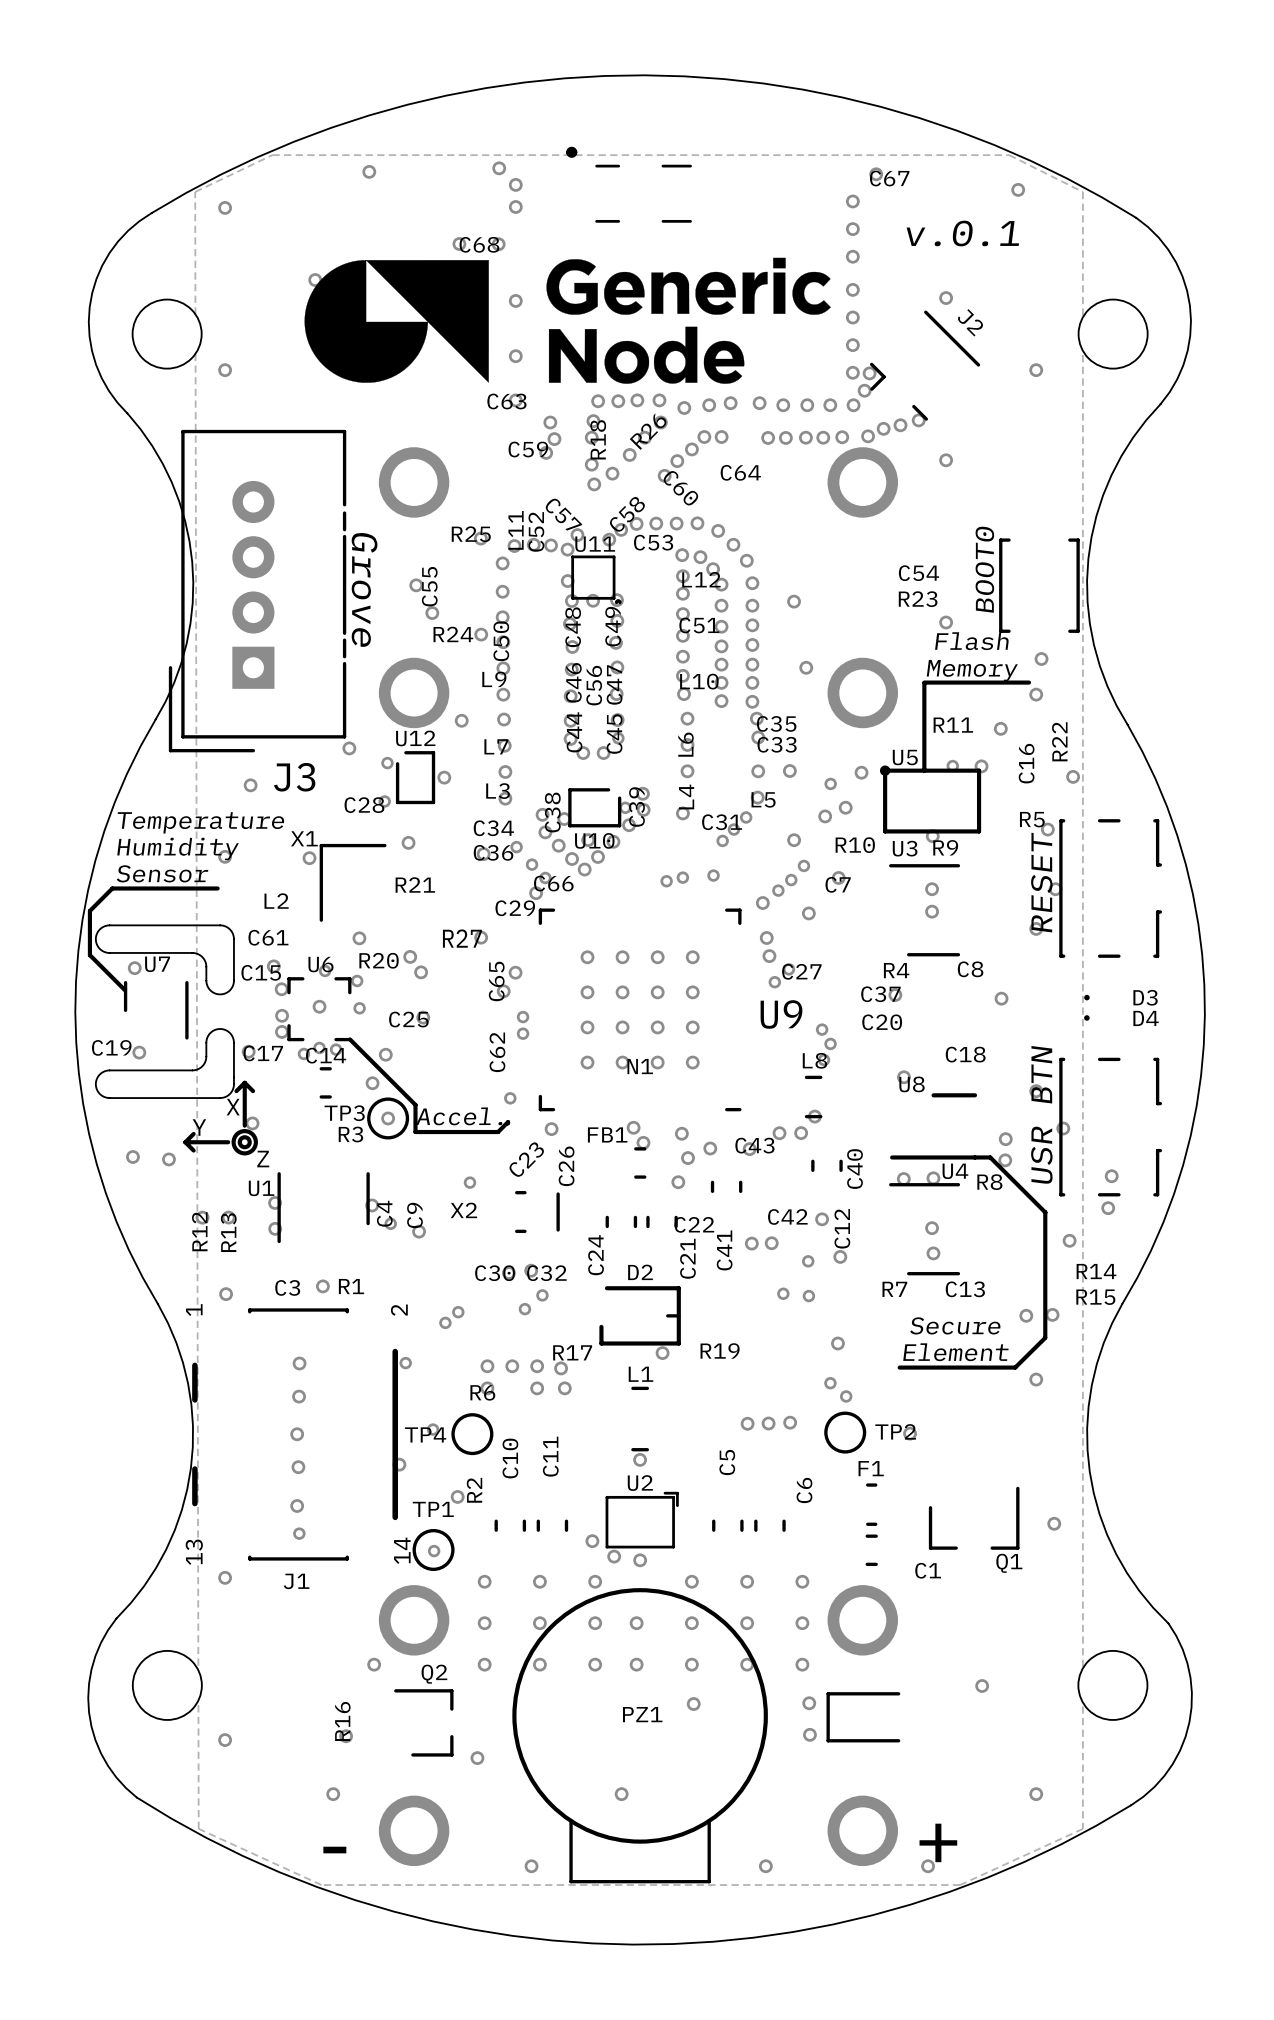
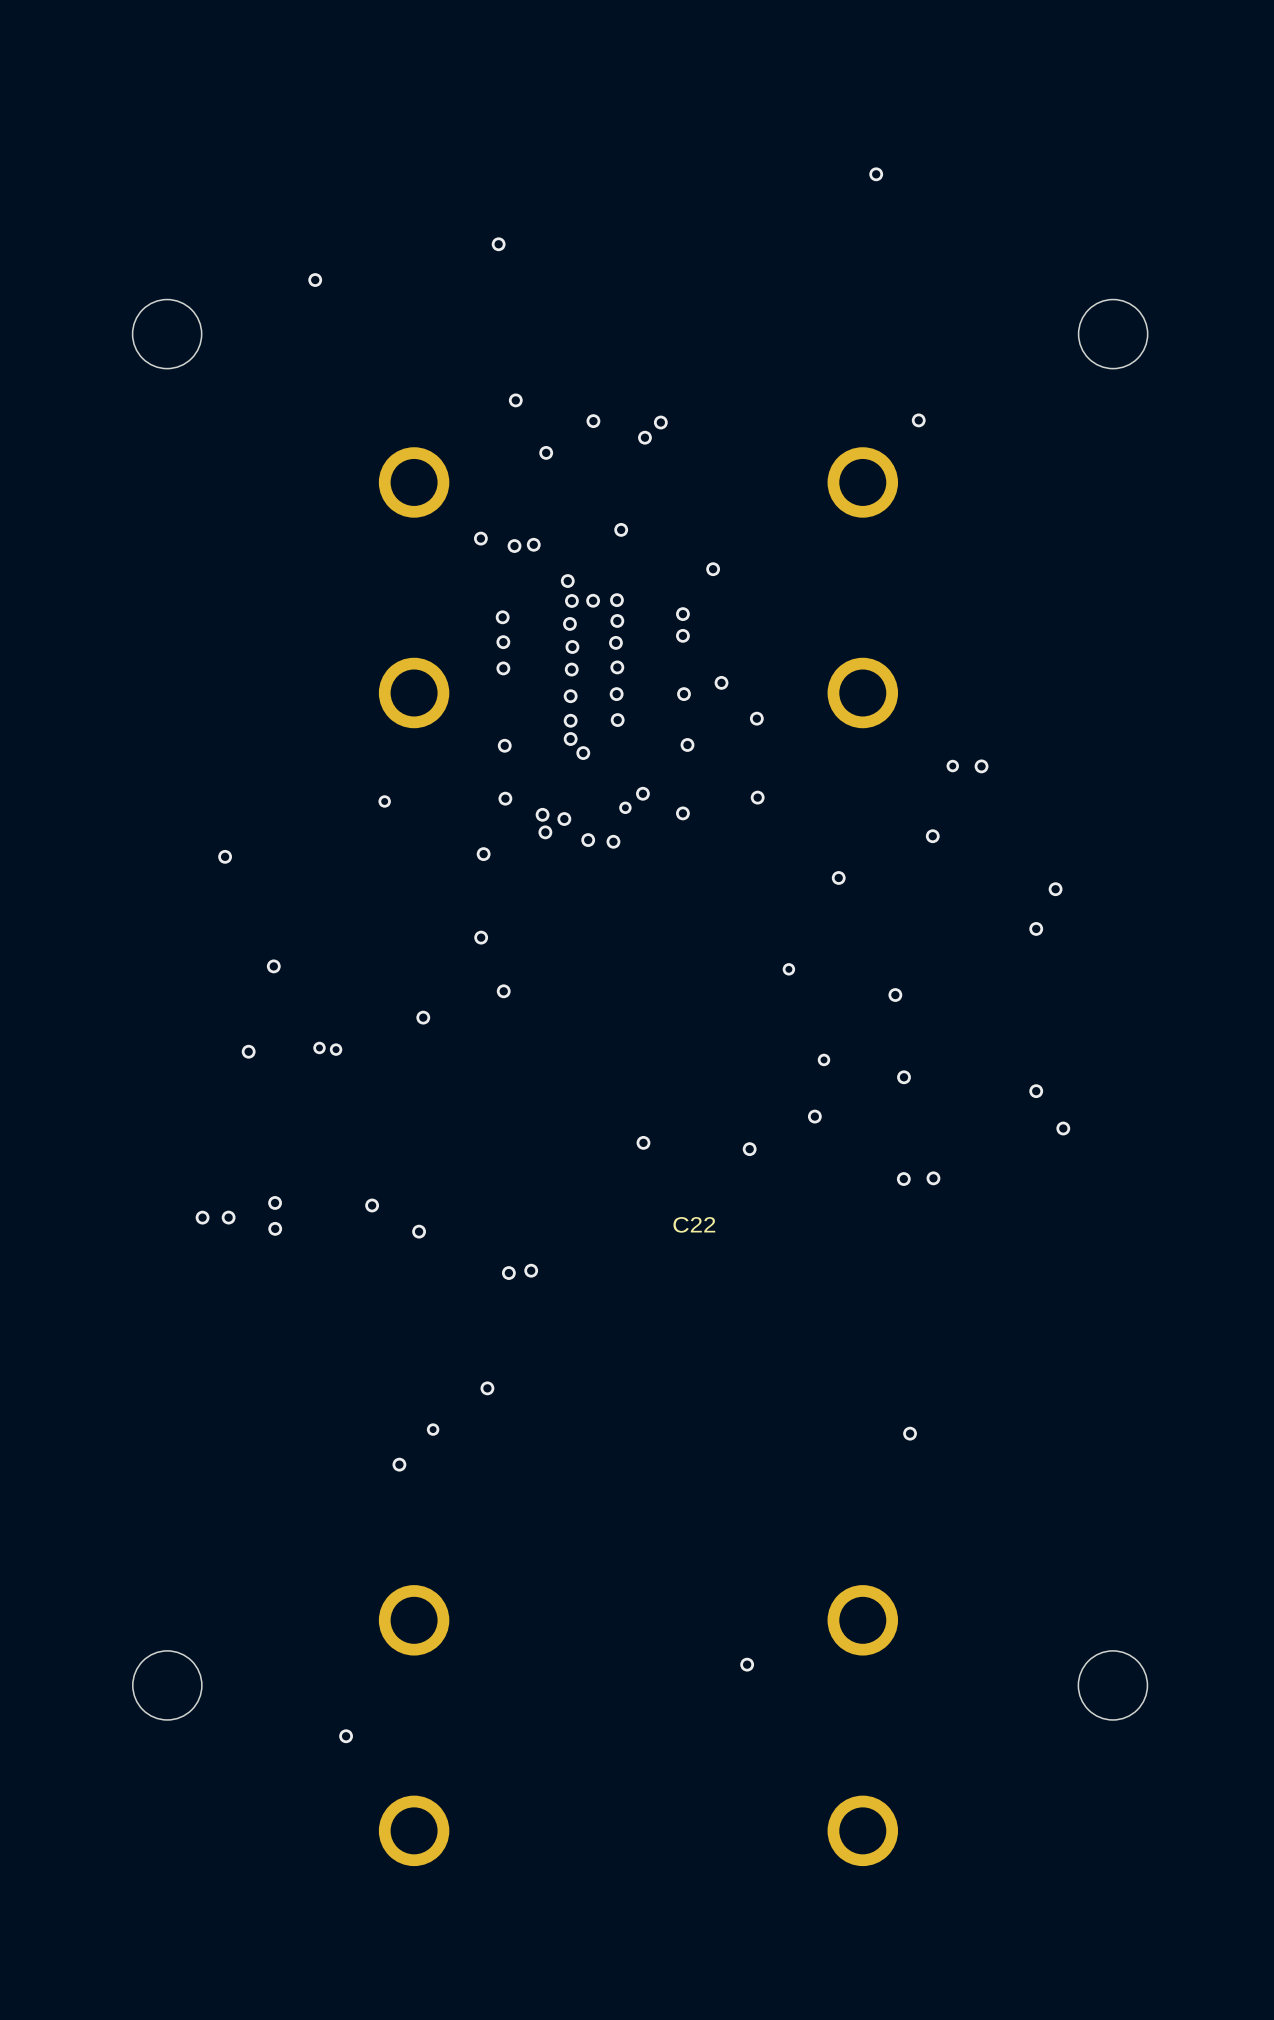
zone outline: (272, 155) (195, 191) (198, 1828) (321, 1885) (960, 1885) (1082, 1828) (1082, 191) (1009, 155) (272, 155) -> none
via: (499, 168) -> none
via: (369, 171) -> none
C67: (889, 178) -> none
via: (515, 184) -> none
part: (629, 184) -> none
via: (1018, 189) -> none
via: (852, 201) -> none
via: (225, 207) -> none
via: (515, 207) -> none
via: (852, 229) -> none
text: v.0.1 (962, 233) -> none
via: (459, 243) -> none
C68: (479, 244) -> none
via: (852, 256) -> none
drawing: [304, 257, 831, 384] -> none
via: (852, 289) -> none
via: (946, 298) -> none
via: (515, 300) -> none
via: (852, 317) -> none
via: (852, 345) -> none
via: (515, 356) -> none
J2: (925, 365) -> none
via: (225, 370) -> none
via: (1036, 370) -> none
via: (852, 372) -> none
via: (869, 373) -> none
via: (864, 390) -> none
via: (637, 400) -> none
via: (659, 400) -> none
C63: (506, 401) -> none
via: (598, 401) -> none
via: (618, 401) -> none
via: (730, 403) -> none
via: (759, 403) -> none
via: (709, 405) -> none
via: (783, 405) -> none
via: (807, 405) -> none
via: (830, 405) -> none
via: (853, 405) -> none
via: (684, 408) -> none
via: (550, 422) -> none
via: (900, 425) -> none
via: (883, 428) -> none
R26: (648, 431) -> none
via: (868, 436) -> none
via: (591, 437) -> none
via: (704, 437) -> none
via: (721, 437) -> none
via: (768, 437) -> none
via: (785, 437) -> none
via: (805, 437) -> none
via: (823, 437) -> none
via: (842, 437) -> none
via: (554, 439) -> none
R18: (598, 439) -> none
C59: (528, 449) -> none
via: (691, 449) -> none
via: (629, 454) -> none
via: (946, 460) -> none
via: (677, 461) -> none
via: (591, 464) -> none
C64: (740, 472) -> none
via: (612, 473) -> none
via: (664, 475) -> none
via: (594, 484) -> none
C60: (680, 488) -> none
C57: (563, 514) -> none
C58: (627, 514) -> none
via: (636, 523) -> none
via: (656, 523) -> none
via: (676, 523) -> none
via: (697, 523) -> none
L11: (516, 530) -> none
via: (718, 530) -> none
C52: (536, 531) -> none
R25: (471, 534) -> none
via: (577, 535) -> none
via: (609, 539) -> none
C53: (653, 542) -> none
via: (733, 544) -> none
via: (551, 545) -> none
via: (567, 549) -> none
via: (682, 555) -> none
via: (700, 557) -> none
via: (746, 560) -> none
via: (502, 563) -> none
text: BOOT0 (984, 569) -> none
C54: (918, 573) -> none
via: (682, 576) -> none
U11: (596, 579) -> none
L12: (701, 579) -> none
via: (752, 583) -> none
via: (721, 584) -> none
via: (416, 585) -> none
part: (1039, 585) -> none
C55: (429, 586) -> none
text: Grove (364, 589) -> none
J3: (257, 591) -> none
via: (502, 591) -> none
via: (682, 593) -> none
R23: (918, 599) -> none
via: (794, 601) -> none
via: (721, 605) -> none
via: (752, 605) -> none
via: (432, 613) -> none
via: (946, 622) -> none
C51: (699, 625) -> none
via: (752, 625) -> none
C49: (613, 626) -> none
via: (721, 626) -> none
C48: (573, 627) -> none
R24: (453, 634) -> none
via: (481, 634) -> none
C50: (501, 641) -> none
text: Flash (971, 641) -> none
via: (752, 644) -> none
via: (721, 646) -> none
via: (682, 656) -> none
via: (1041, 659) -> none
via: (721, 664) -> none
via: (752, 664) -> none
via: (806, 667) -> none
text: Memory (972, 670) -> none
via: (682, 675) -> none
L9: (494, 679) -> none
L10: (699, 681) -> none
C46: (573, 682) -> none
via: (752, 682) -> none
line: (924, 682) (1028, 682) -> none
line: (924, 682) (924, 770) -> none
C47: (614, 684) -> none
C56: (594, 685) -> none
via: (503, 694) -> none
via: (1036, 694) -> none
via: (721, 701) -> none
via: (752, 701) -> none
via: (687, 718) -> none
via: (504, 719) -> none
via: (461, 720) -> none
C35: (776, 723) -> none
R11: (953, 725) -> none
via: (1000, 728) -> none
C44: (574, 732) -> none
C45: (614, 734) -> none
via: (758, 737) -> none
via: (618, 738) -> none
R22: (1059, 741) -> none
L6: (686, 744) -> none
C33: (777, 744) -> none
L7: (496, 746) -> none
via: (349, 748) -> none
via: (603, 753) -> none
via: (387, 763) -> none
C16: (1026, 763) -> none
via: (687, 771) -> none
via: (758, 771) -> none
via: (789, 771) -> none
via: (505, 772) -> none
via: (861, 772) -> none
via: (1073, 776) -> none
U12: (415, 777) -> none
via: (444, 777) -> none
via: (830, 783) -> none
via: (250, 785) -> none
L3: (498, 791) -> none
L4: (686, 796) -> none
L5: (763, 799) -> none
U5: (930, 799) -> none
C28: (364, 805) -> none
U10: (594, 807) -> none
C39: (637, 807) -> none
via: (845, 807) -> none
via: (643, 809) -> none
C38: (552, 812) -> none
via: (825, 816) -> none
via: (746, 817) -> none
R5: (1032, 819) -> none
text: Temperature (200, 822) -> none
C31: (722, 822) -> none
via: (629, 825) -> none
C34: (493, 828) -> none
via: (733, 829) -> none
via: (1047, 829) -> none
via: (722, 840) -> none
via: (794, 840) -> none
via: (408, 842) -> none
via: (558, 845) -> none
R10: (855, 845) -> none
via: (516, 847) -> none
R9: (945, 847) -> none
text: Humidity (178, 848) -> none
C36: (493, 852) -> none
via: (597, 856) -> none
via: (309, 858) -> none
via: (572, 859) -> none
via: (532, 864) -> none
via: (803, 865) -> none
via: (584, 869) -> none
text: Sensor (162, 873) -> none
via: (713, 875) -> none
via: (545, 877) -> none
via: (682, 877) -> none
via: (791, 880) -> none
via: (666, 881) -> none
X1: (353, 882) -> none
text: RESET (1041, 882) -> none
C66: (553, 883) -> none
R21: (415, 884) -> none
C7: (838, 884) -> none
line: (217, 888) (112, 888) (89, 910) (89, 955) (125, 990) -> none
part: (1110, 888) -> none
via: (932, 889) -> none
via: (778, 890) -> none
via: (536, 893) -> none
L2: (276, 901) -> none
via: (762, 903) -> none
C29: (515, 908) -> none
U3: (924, 910) -> none
via: (932, 911) -> none
via: (808, 913) -> none
board edge: (109, 925) (220, 925) (227, 927) (233, 937) (233, 980) (232, 987) (221, 994) (210, 990) (206, 982) (205, 961) (196, 953) (109, 952) (102, 951) (96, 944) (96, 935) (101, 928) (109, 925) -> none
C61: (268, 937) -> none
via: (766, 937) -> none
via: (359, 938) -> none
R27: (462, 938) -> none
via: (410, 956) -> none
via: (769, 956) -> none
via: (587, 957) -> none
via: (622, 957) -> none
via: (657, 957) -> none
via: (692, 957) -> none
R20: (379, 960) -> none
via: (134, 968) -> none
C8: (970, 969) -> none
via: (325, 970) -> none
R4: (896, 970) -> none
C27: (801, 971) -> none
C15: (261, 972) -> none
via: (421, 972) -> none
via: (515, 972) -> none
via: (357, 980) -> none
C65: (496, 981) -> none
via: (774, 982) -> none
via: (281, 989) -> none
via: (587, 992) -> none
via: (622, 992) -> none
via: (657, 992) -> none
via: (692, 992) -> none
C37: (880, 994) -> none
D3: (1086, 997) -> none
via: (1001, 998) -> none
via: (319, 1006) -> none
via: (359, 1008) -> none
U6: (319, 1009) -> none
U9: (640, 1009) -> none
U7: (156, 1010) -> none
via: (282, 1015) -> none
via: (523, 1017) -> none
D4: (1086, 1017) -> none
C25: (408, 1019) -> none
C20: (882, 1022) -> none
via: (587, 1027) -> none
via: (622, 1027) -> none
via: (657, 1027) -> none
via: (692, 1027) -> none
via: (822, 1029) -> none
via: (281, 1031) -> none
via: (523, 1033) -> none
line: (350, 1039) (415, 1104) (415, 1132) (498, 1132) (508, 1123) -> none
board edge: (206, 1042) (205, 1060) (197, 1069) (106, 1070) (97, 1077) (96, 1089) (101, 1095) (109, 1098) (225, 1096) (231, 1092) (233, 1086) (232, 1037) (227, 1030) (218, 1029) (209, 1034) (206, 1042) -> none
via: (830, 1043) -> none
C19: (111, 1047) -> none
via: (139, 1052) -> none
C62: (497, 1052) -> none
C17: (263, 1053) -> none
via: (303, 1053) -> none
via: (385, 1054) -> none
C18: (965, 1054) -> none
via: (587, 1062) -> none
via: (622, 1062) -> none
via: (657, 1062) -> none
via: (692, 1062) -> none
N1: (640, 1066) -> none
line: (244, 1082) (236, 1091) -> none
line: (244, 1082) (253, 1091) -> none
line: (244, 1082) (244, 1125) -> none
C14: (325, 1082) -> none
via: (372, 1083) -> none
L8: (813, 1097) -> none
via: (510, 1098) -> none
text: X (233, 1107) -> none
text: USR BTN (1041, 1114) -> none
text: Accel. (459, 1116) -> none
TP3: (388, 1118) -> none
via: (388, 1118) -> none
via: (252, 1123) -> none
U8: (933, 1126) -> none
text: Y (199, 1127) -> none
via: (633, 1127) -> none
part: (1110, 1127) -> none
drawing: [231, 1129, 258, 1156] -> none
via: (551, 1129) -> none
line: (193, 1133) (185, 1142) -> none
via: (681, 1133) -> none
via: (779, 1133) -> none
via: (801, 1133) -> none
R3: (350, 1134) -> none
via: (1005, 1139) -> none
line: (185, 1142) (193, 1150) -> none
line: (185, 1142) (228, 1142) -> none
C43: (754, 1145) -> none
via: (710, 1148) -> none
via: (132, 1156) -> none
line: (975, 1157) (990, 1157) (1045, 1212) -> none
via: (688, 1158) -> none
via: (168, 1159) -> none
text: Z (263, 1159) -> none
C23: (526, 1159) -> none
via: (1005, 1160) -> none
FB1: (640, 1162) -> none
C40: (826, 1165) -> none
C26: (566, 1166) -> none
via: (1111, 1176) -> none
via: (469, 1182) -> none
via: (678, 1182) -> none
R8: (989, 1182) -> none
C41: (726, 1186) -> none
U1: (323, 1207) -> none
via: (1108, 1208) -> none
X2: (537, 1212) -> none
line: (1045, 1212) (1045, 1337) -> none
C4: (384, 1213) -> none
C9: (414, 1215) -> none
C42: (787, 1216) -> none
via: (822, 1219) -> none
C24: (621, 1221) -> none
C21: (662, 1221) -> none
via: (390, 1223) -> none
C12: (842, 1228) -> none
via: (932, 1228) -> none
U4: (924, 1229) -> none
R12: (199, 1231) -> none
R13: (228, 1232) -> none
via: (1069, 1240) -> none
via: (751, 1243) -> none
via: (771, 1243) -> none
via: (933, 1253) -> none
via: (840, 1256) -> none
via: (808, 1261) -> none
R14: (1096, 1271) -> none
C30: (495, 1273) -> none
C32: (546, 1273) -> none
via: (322, 1286) -> none
R1: (351, 1286) -> none
C3: (287, 1287) -> none
R7: (894, 1289) -> none
C13: (965, 1289) -> none
via: (783, 1293) -> none
via: (226, 1294) -> none
via: (542, 1295) -> none
via: (808, 1296) -> none
R15: (1095, 1297) -> none
via: (524, 1309) -> none
via: (458, 1312) -> none
via: (1052, 1314) -> none
D2: (640, 1315) -> none
via: (1026, 1315) -> none
via: (445, 1322) -> none
text: Secure (955, 1325) -> none
line: (1045, 1337) (1015, 1367) -> none
via: (837, 1343) -> none
R19: (720, 1350) -> none
R17: (572, 1352) -> none
text: Element (955, 1352) -> none
via: (662, 1353) -> none
via: (299, 1363) -> none
via: (405, 1363) -> none
via: (487, 1366) -> none
via: (512, 1366) -> none
via: (537, 1366) -> none
line: (899, 1367) (1015, 1367) -> none
via: (561, 1368) -> none
via: (1036, 1379) -> none
via: (830, 1383) -> none
via: (537, 1388) -> none
via: (564, 1388) -> none
R6: (482, 1392) -> none
via: (299, 1396) -> none
via: (846, 1396) -> none
L1: (640, 1419) -> none
via: (790, 1422) -> none
via: (747, 1423) -> none
via: (768, 1423) -> none
TP2: (845, 1432) -> none
J1: (295, 1434) -> none
via: (297, 1434) -> none
TP4: (472, 1434) -> none
via: (640, 1459) -> none
via: (298, 1467) -> none
R2: (474, 1490) -> none
C6: (804, 1490) -> none
via: (457, 1496) -> none
F1: (871, 1504) -> none
via: (297, 1505) -> none
Q1: (974, 1518) -> none
U2: (642, 1520) -> none
via: (1054, 1523) -> none
C10: (510, 1525) -> none
C11: (552, 1525) -> none
C5: (727, 1525) -> none
part: (769, 1525) -> none
via: (299, 1533) -> none
via: (592, 1541) -> none
TP1: (433, 1549) -> none
C1: (871, 1550) -> none
via: (434, 1551) -> none
via: (614, 1556) -> none
via: (640, 1560) -> none
via: (225, 1577) -> none
via: (484, 1581) -> none
via: (539, 1581) -> none
via: (595, 1581) -> none
via: (691, 1581) -> none
via: (747, 1581) -> none
via: (802, 1581) -> none
via: (484, 1623) -> none
via: (539, 1623) -> none
via: (595, 1623) -> none
via: (636, 1623) -> none
via: (691, 1623) -> none
via: (747, 1623) -> none
via: (802, 1623) -> none
board edge: (1168, 1623) (1182, 1649) (1190, 1678) (1191, 1692) (1189, 1722) (1180, 1750) (1172, 1763) (1164, 1775) (1143, 1796) (1060, 1844) (987, 1877) (949, 1891) (872, 1915) (793, 1931) (713, 1941) (632, 1944) (552, 1940) (512, 1935) (432, 1921) (355, 1900) (317, 1886) (242, 1855) (206, 1837) (136, 1797) (116, 1777) (101, 1753) (91, 1726) (88, 1698) (91, 1669) (95, 1655) (108, 1630) (144, 1586) (166, 1549) (181, 1510) (187, 1489) (192, 1447) (191, 1404) (183, 1362) (167, 1323) (128, 1250) (105, 1193) (96, 1163) (83, 1103) (76, 1042) (75, 1012) (78, 950) (82, 920) (95, 860) (114, 802) (126, 774) (174, 682) (186, 643) (192, 603) (193, 582) (189, 541) (179, 501) (162, 463) (152, 446) (117, 402) (101, 378) (91, 350) (89, 336) (88, 321) (92, 292) (102, 265) (118, 241) (139, 221) (185, 193) (257, 157) (331, 127) (407, 104) (485, 88) (564, 78) (644, 75) (684, 76) (724, 79) (803, 89) (881, 106) (957, 130) (1030, 160) (1101, 197) (1148, 227) (1168, 249) (1176, 262) (1187, 290) (1191, 320) (1187, 350) (1177, 379) (1169, 392) (1133, 437) (1121, 456) (1103, 495) (1091, 537) (1088, 558) (1087, 602) (1093, 645) (1107, 686) (1155, 778) (1177, 835) (1185, 864) (1192, 894) (1202, 954) (1204, 1015) (1203, 1045) (1196, 1105) (1183, 1165) (1173, 1194) (1151, 1250) (1112, 1323) (1103, 1343) (1091, 1385) (1087, 1428) (1089, 1471) (1099, 1514) (1107, 1534) (1127, 1573) (1153, 1607) (1168, 1623) -> none
via: (374, 1664) -> none
via: (484, 1664) -> none
via: (539, 1664) -> none
via: (595, 1664) -> none
via: (636, 1664) -> none
via: (691, 1664) -> none
via: (802, 1664) -> none
via: (982, 1685) -> none
via: (809, 1703) -> none
via: (693, 1704) -> none
part: (863, 1717) -> none
R16: (342, 1721) -> none
Q2: (423, 1722) -> none
via: (809, 1734) -> none
PZ1: (640, 1735) -> none
via: (225, 1740) -> none
via: (477, 1758) -> none
via: (333, 1794) -> none
via: (621, 1794) -> none
via: (1036, 1794) -> none
text: + (938, 1842) -> none
text: - (334, 1850) -> none
via: (531, 1866) -> none
via: (765, 1866) -> none
via: (928, 1866) -> none

